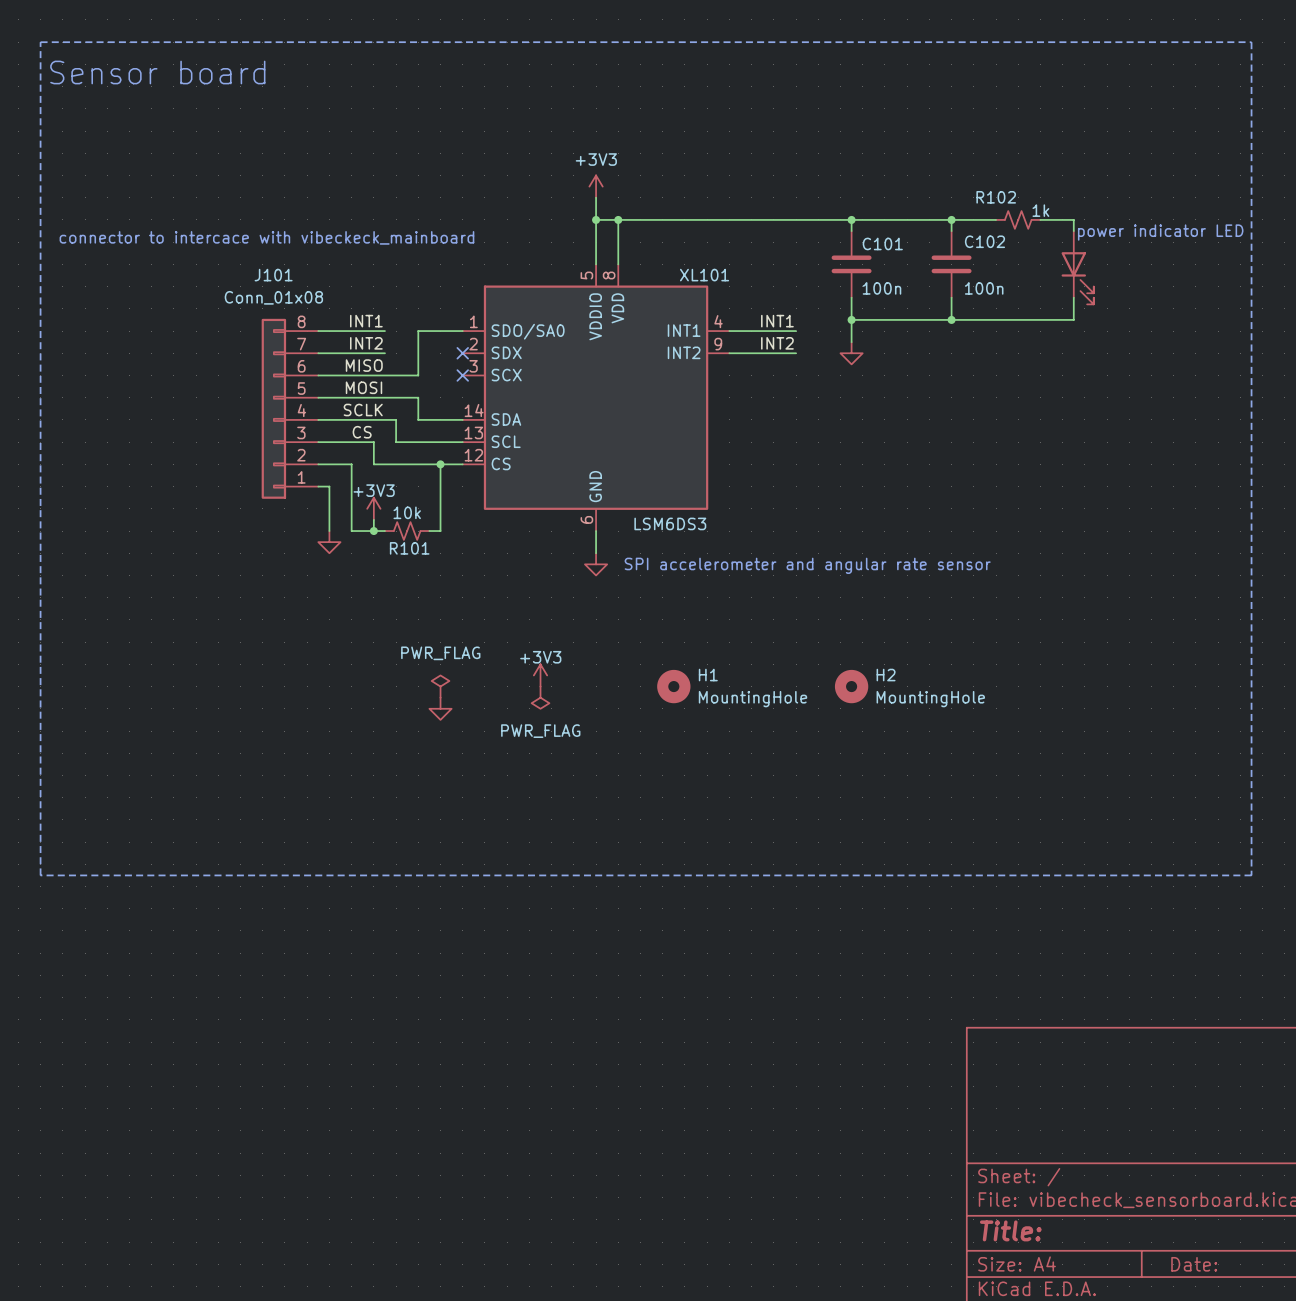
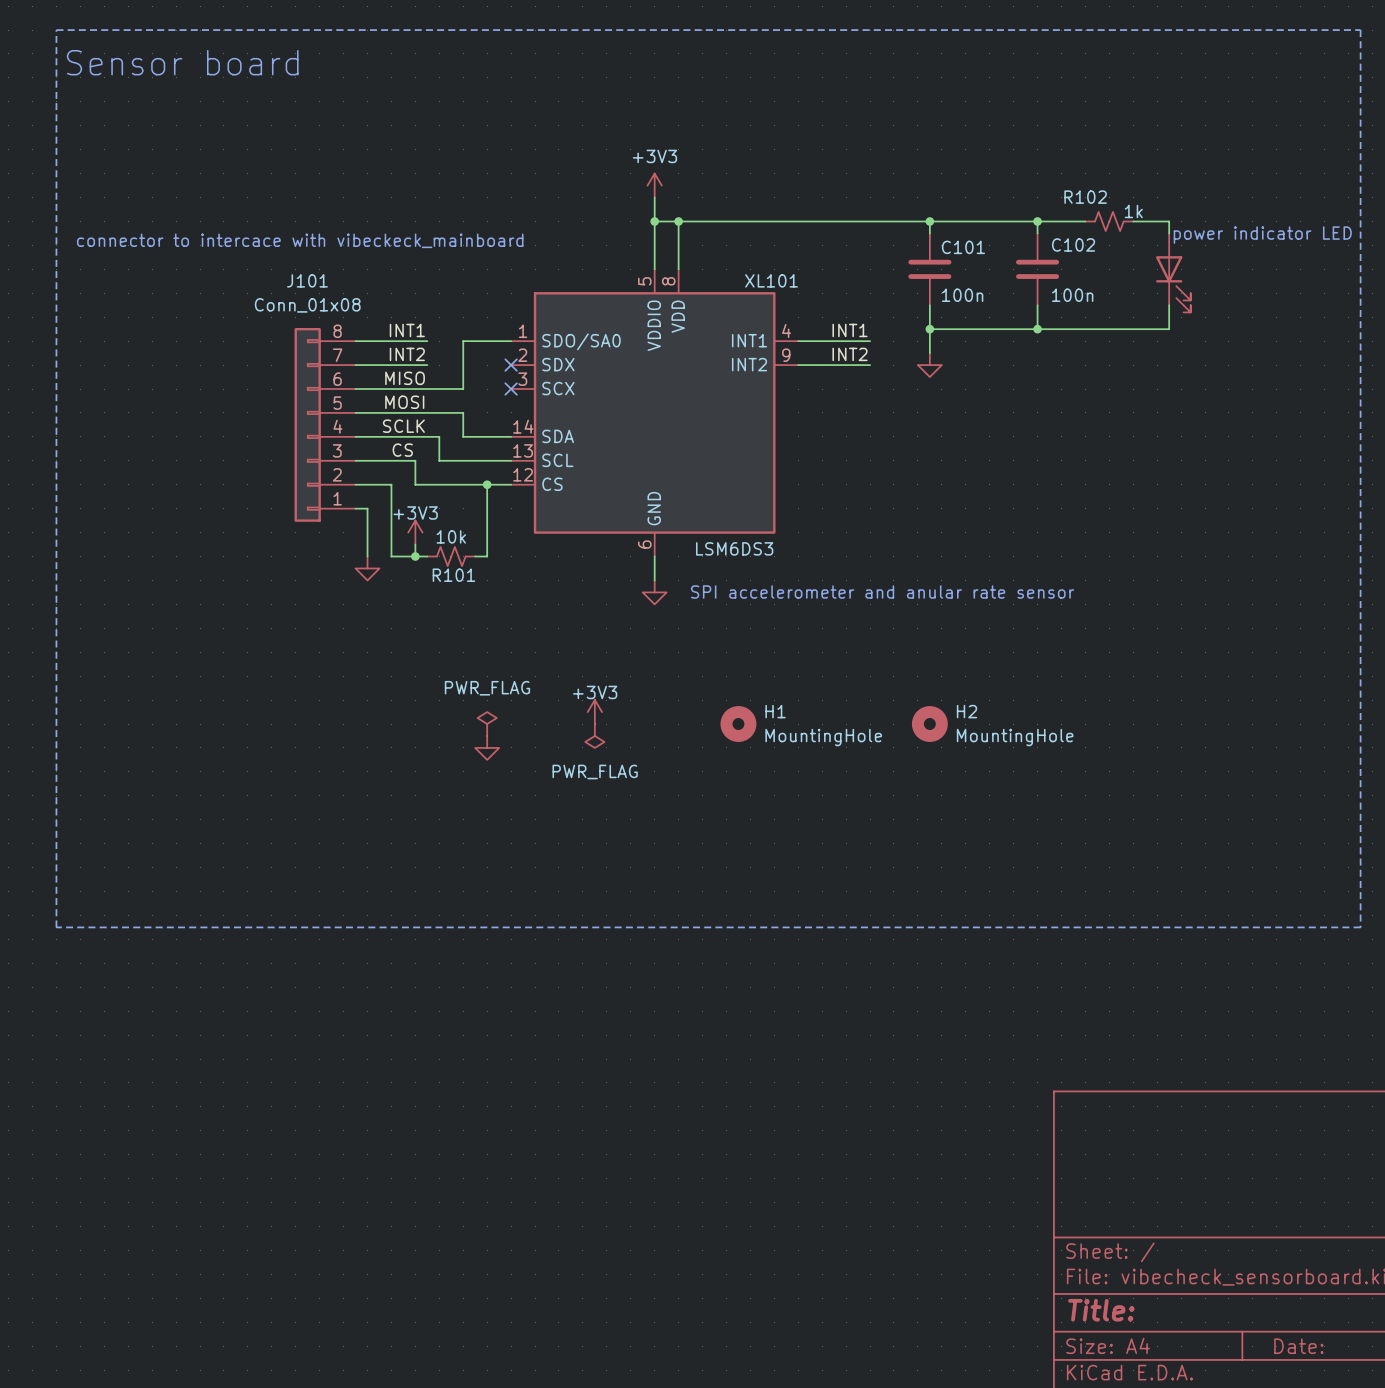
text: SPI accelerometer and angular rate sensor (807, 565) -> SPI accelerometer and anular rate sensor (882, 591)

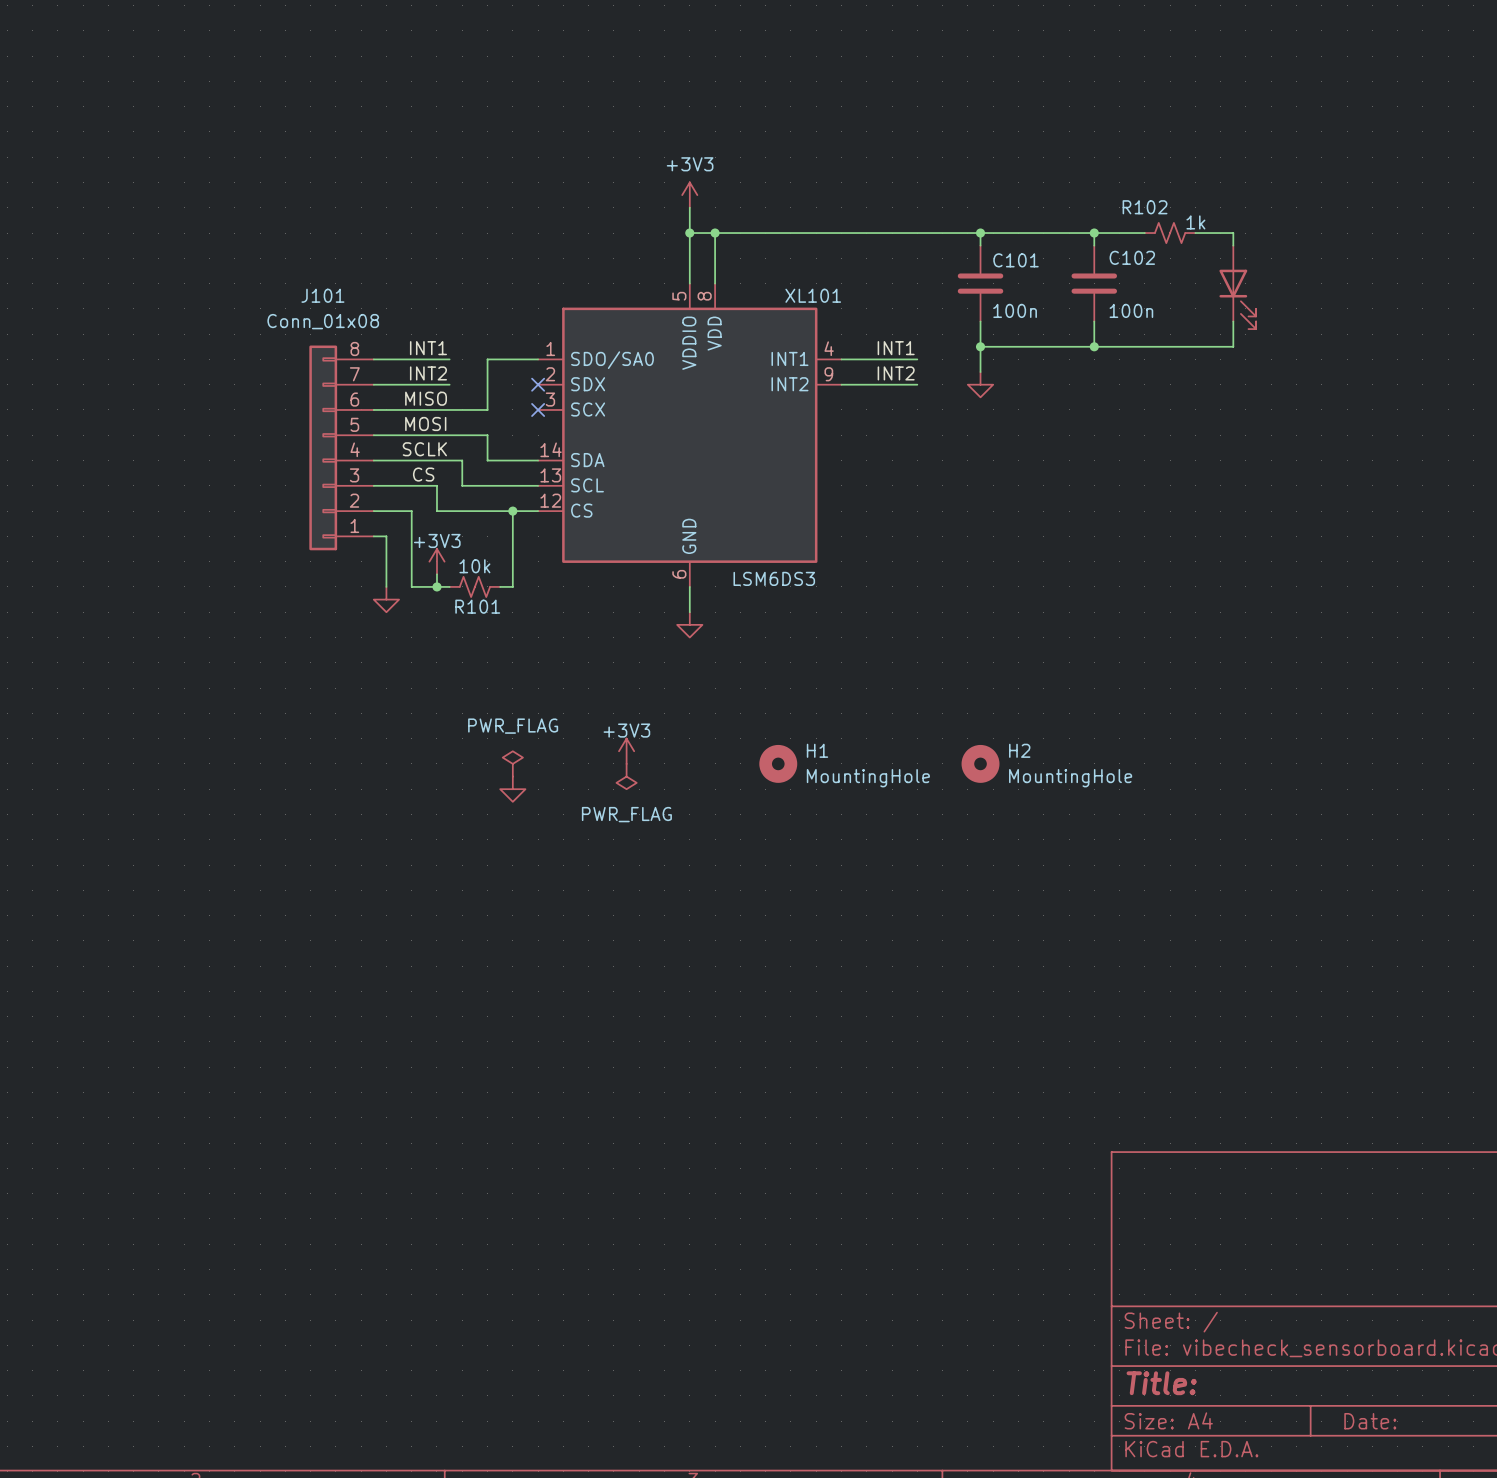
line: (56, 30) (1360, 30) (1360, 927) (56, 927) (56, 30) -> none
text: Sensor board (182, 62) -> none
text: power indicator LED (1262, 235) -> none
text: connector to intercace with vibeckeck_mainboard (300, 240) -> none
text: SPI accelerometer and anular rate sensor (882, 591) -> none

